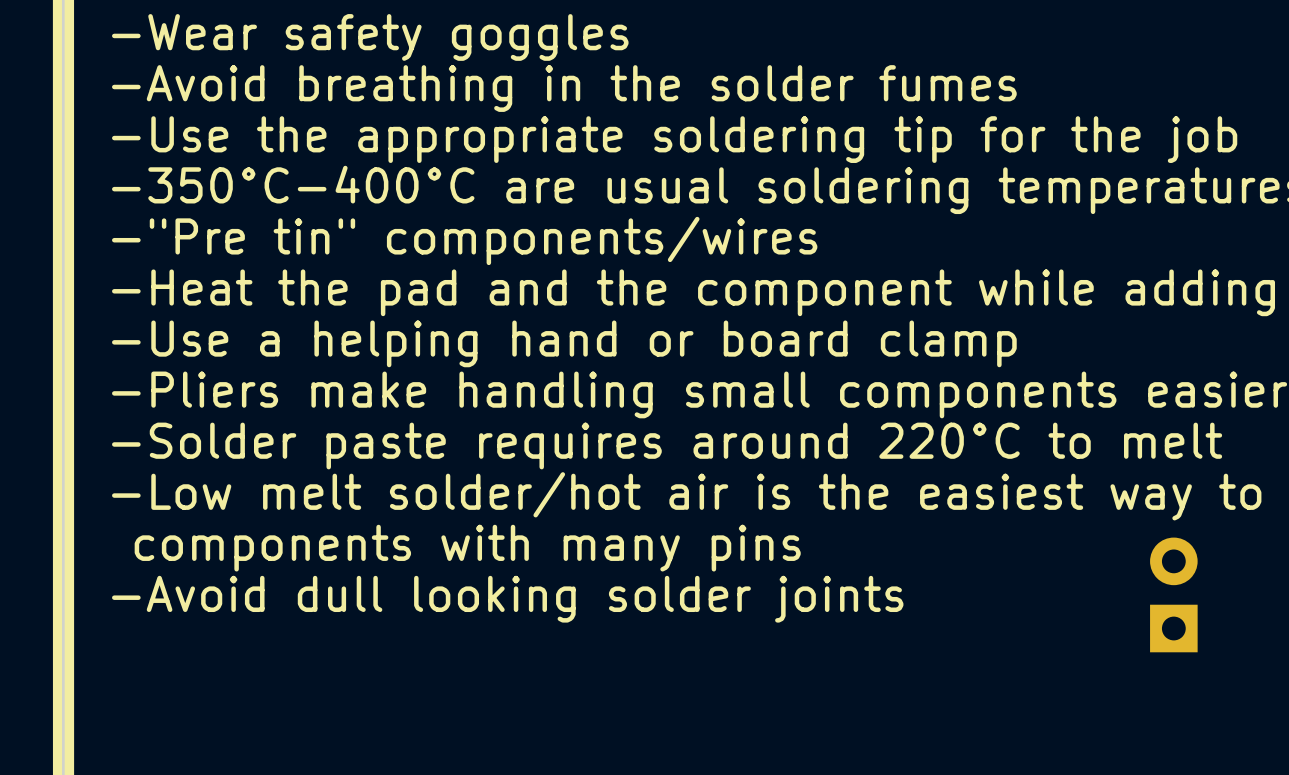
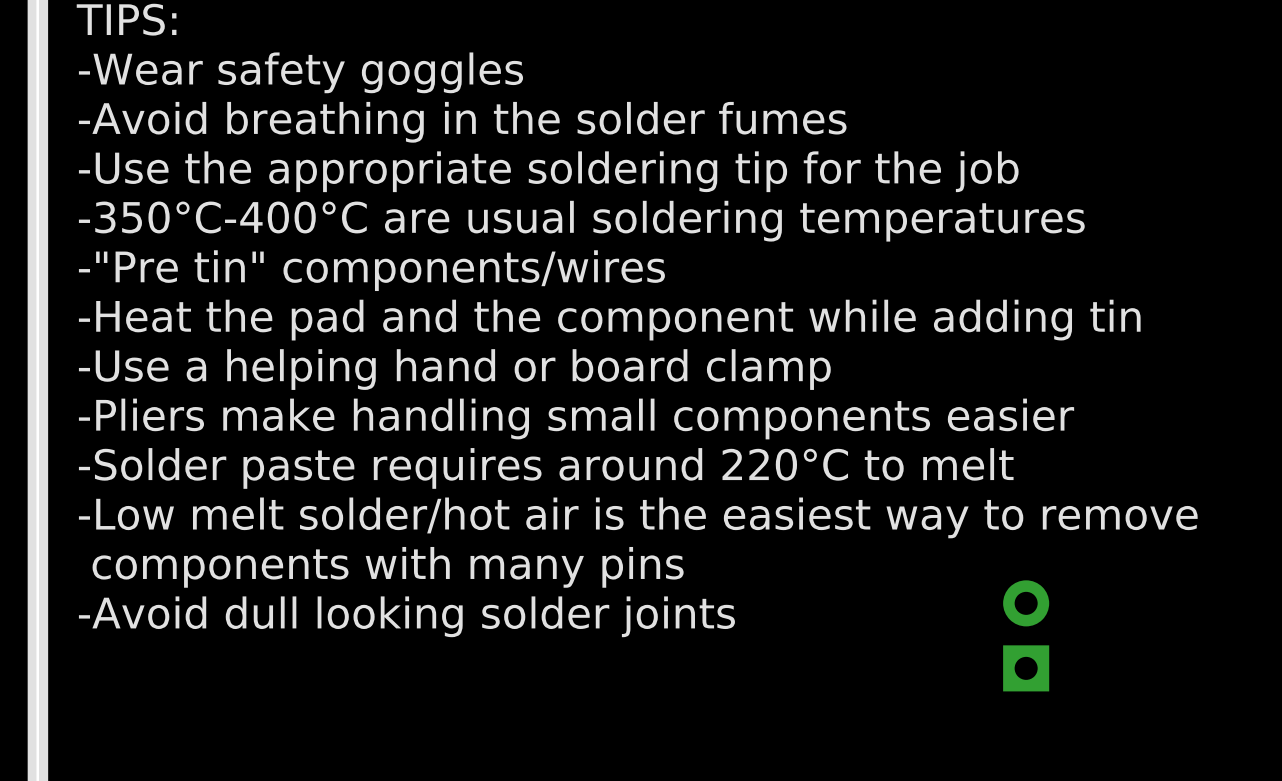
part position: (1173, 594) -> (1026, 635)

